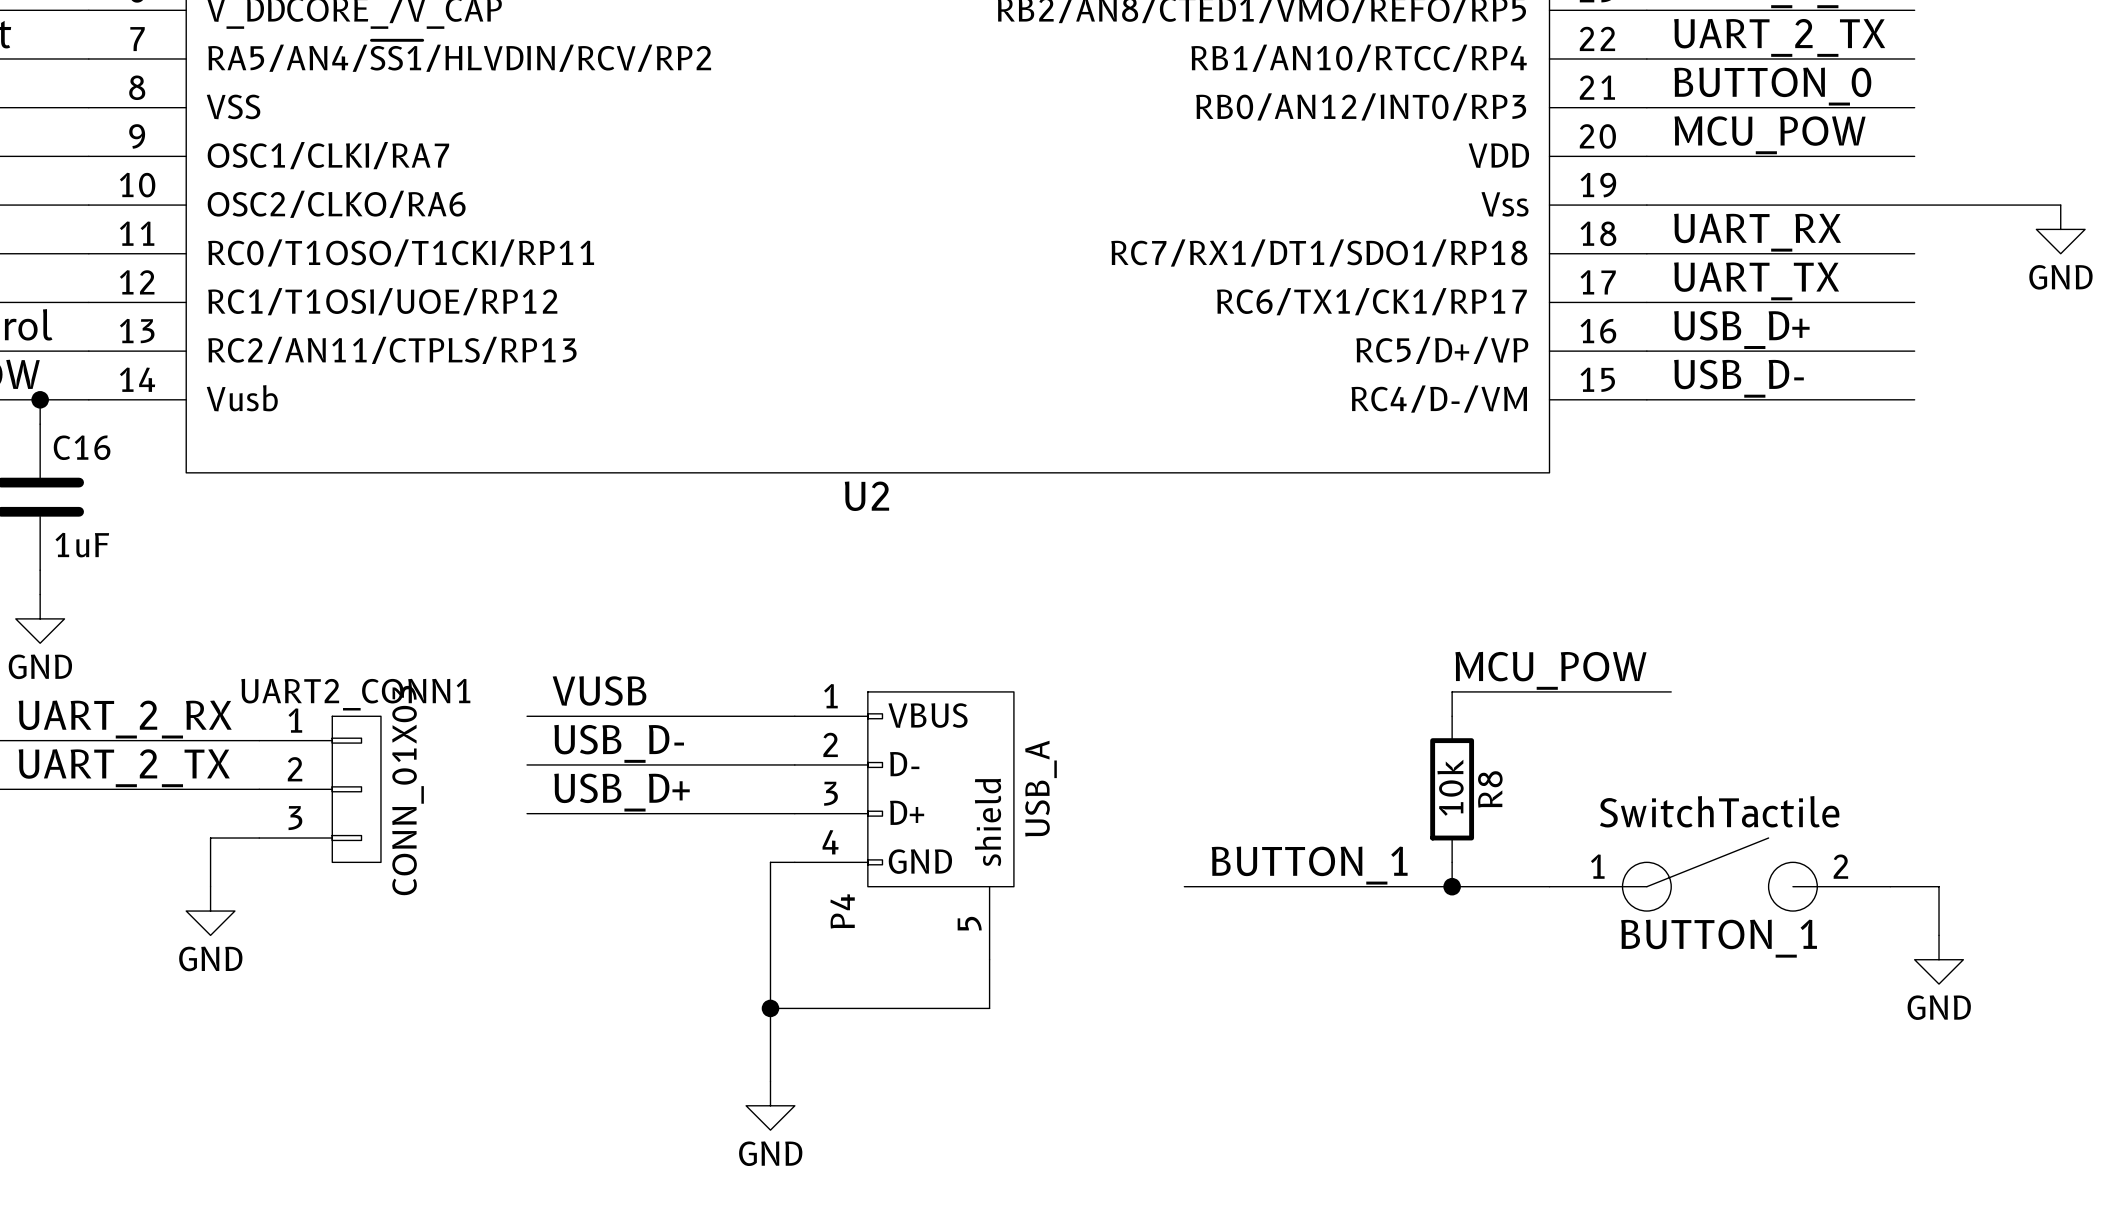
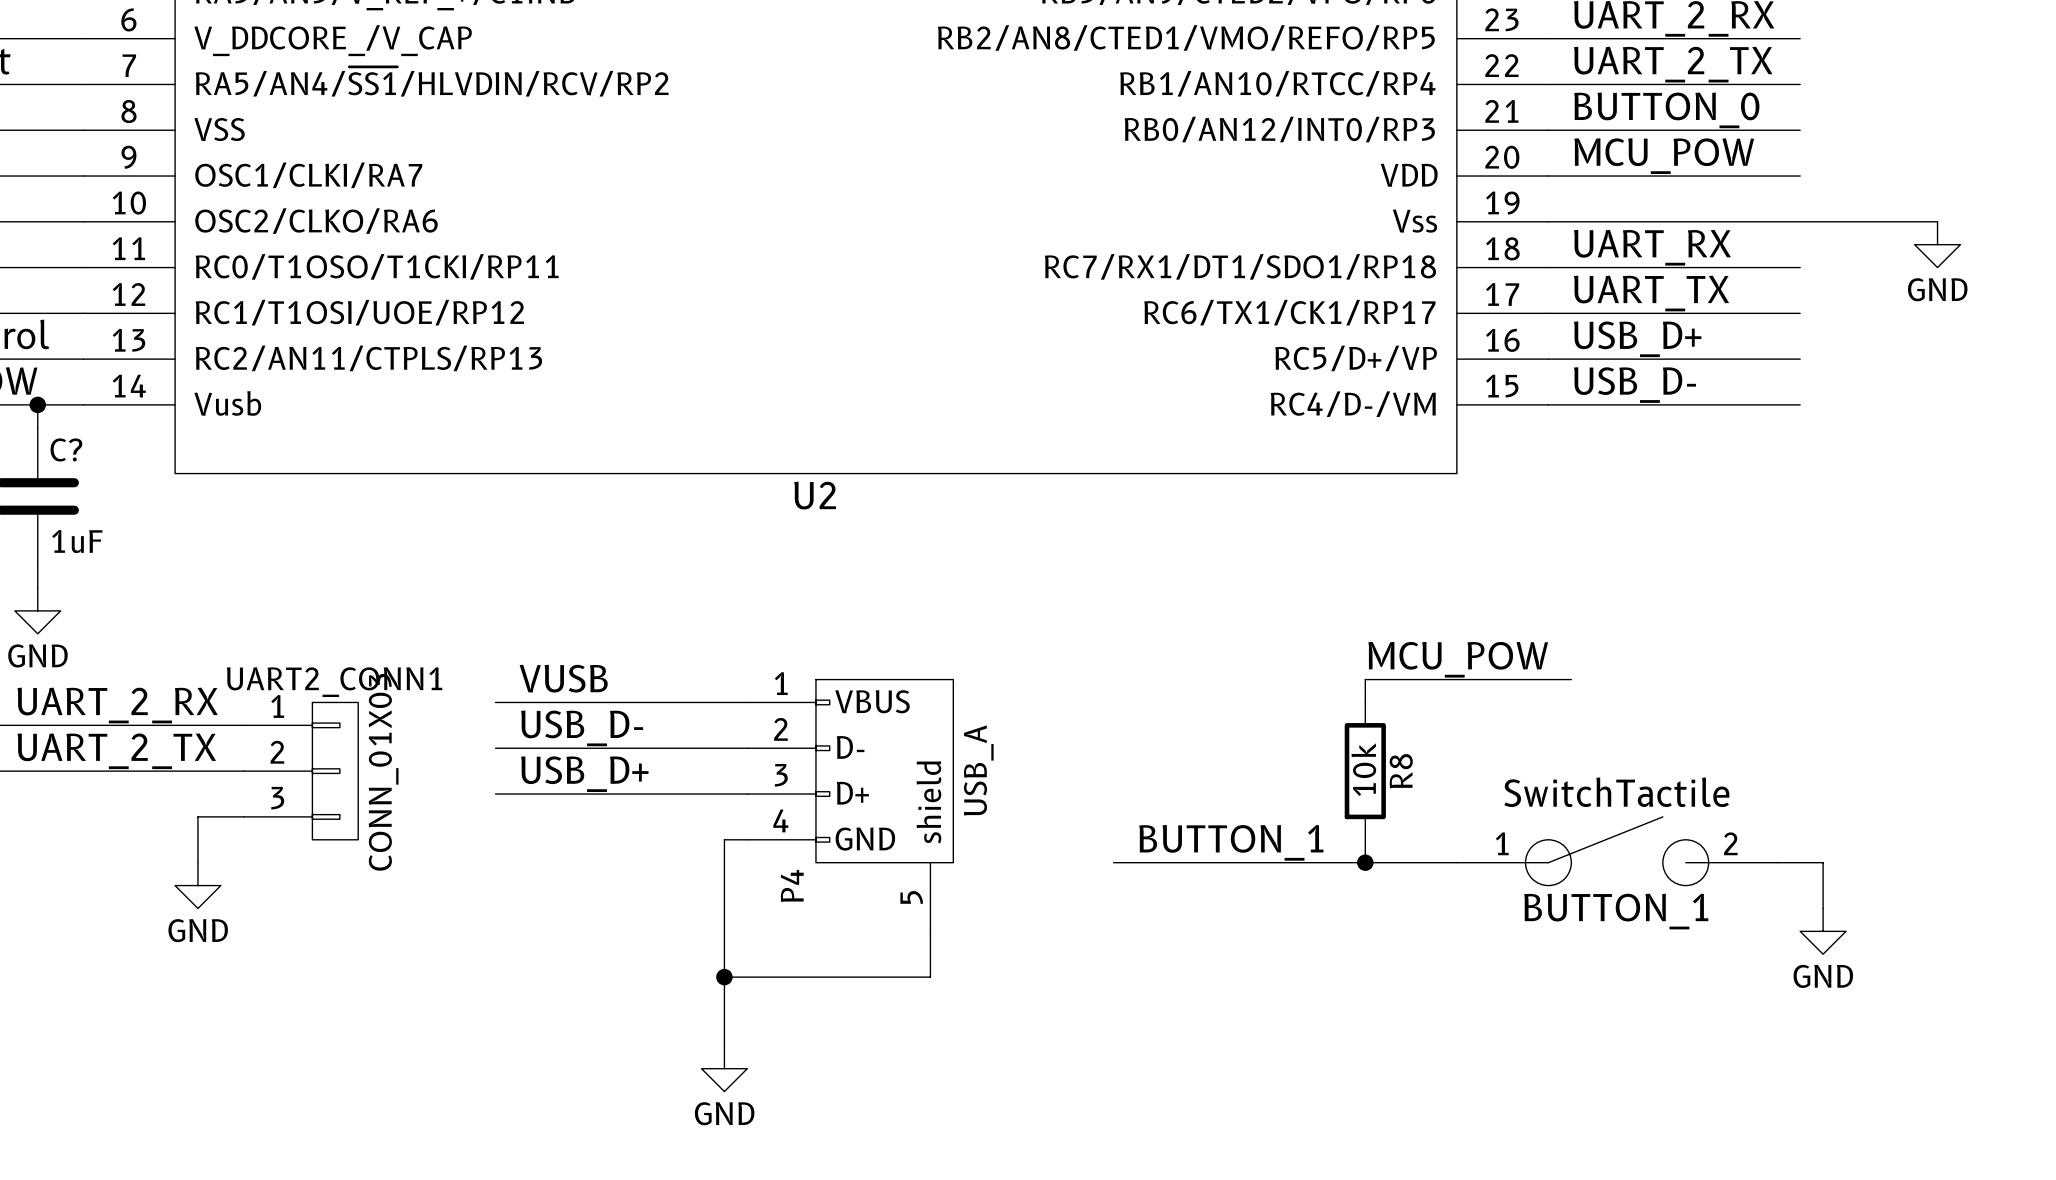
C16 name: C16 (82, 447) -> C? (66, 449)

